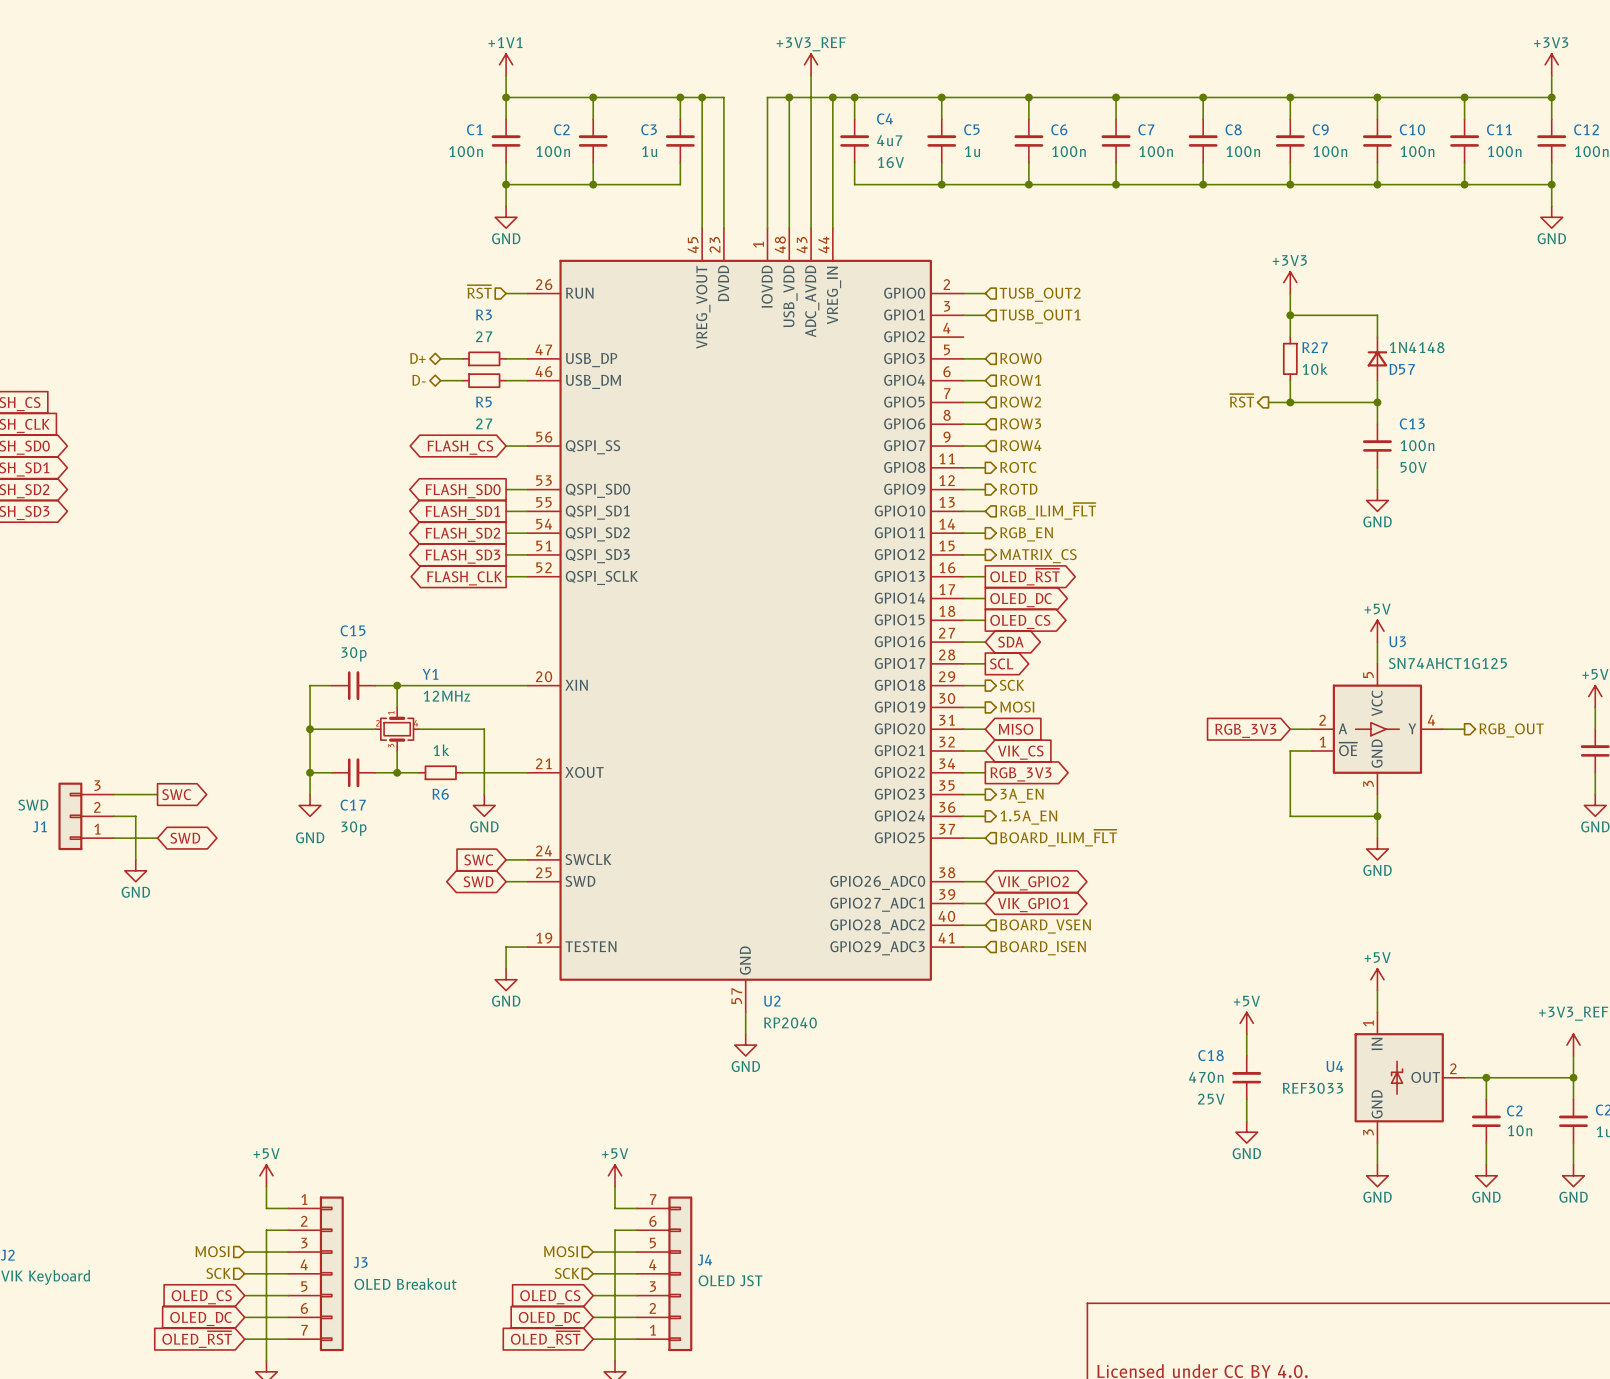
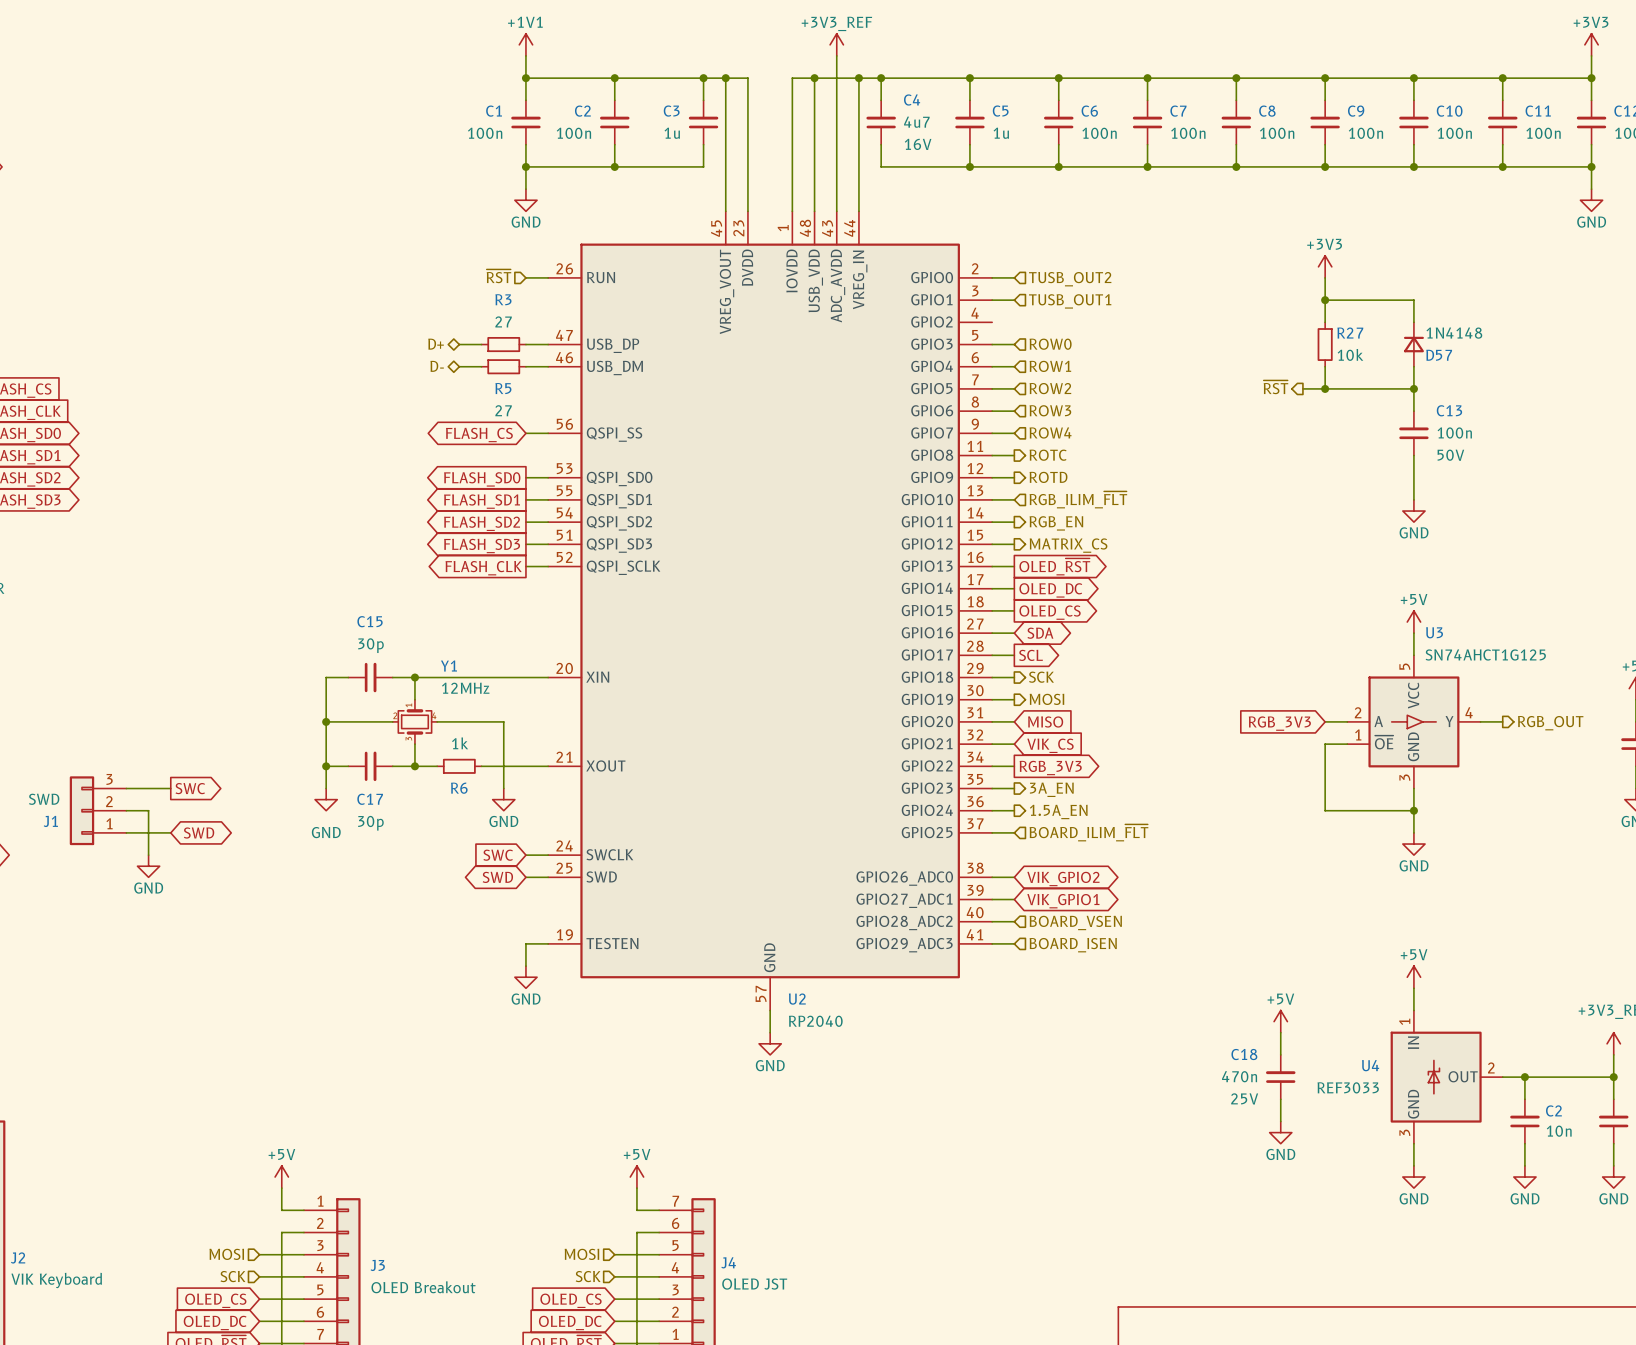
power symbol position: GND (1377, 500) -> GND (1413, 511)

